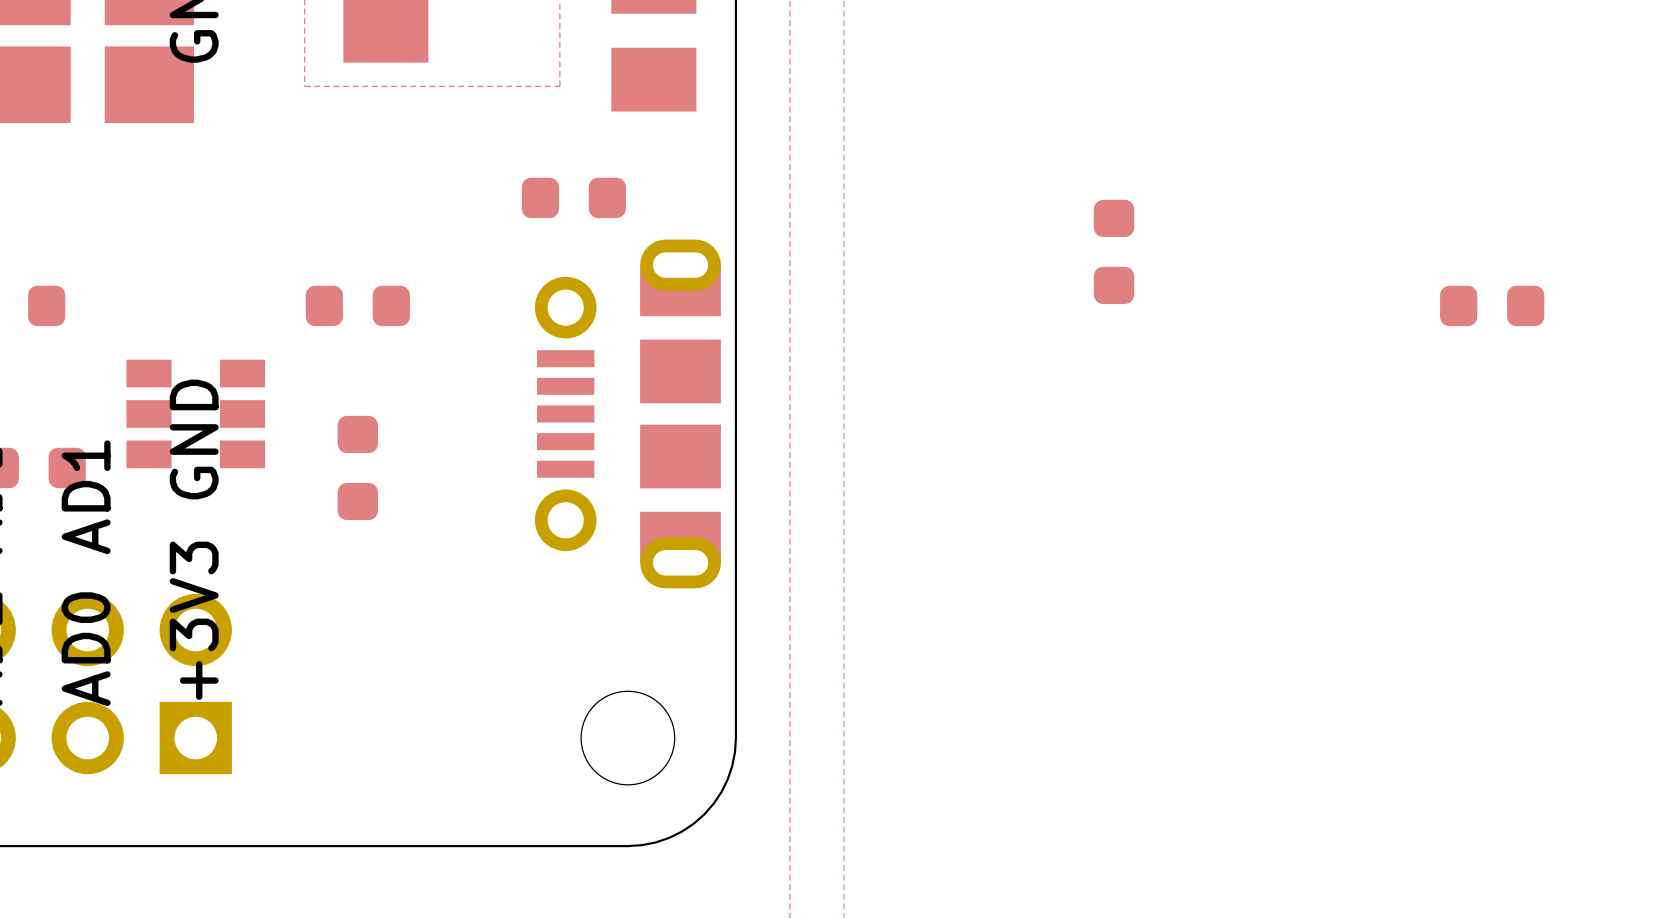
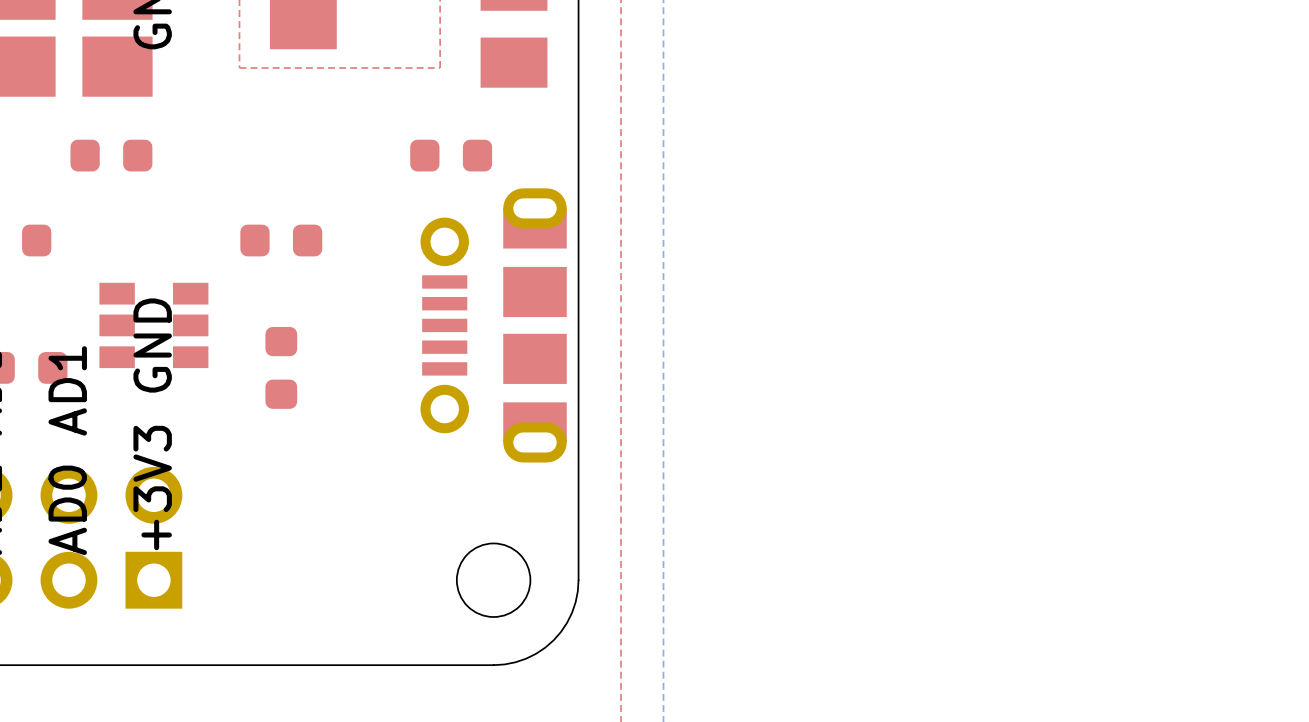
part: none -> (111, 155)
part: (1114, 251) -> none
part: (1492, 305) -> none

